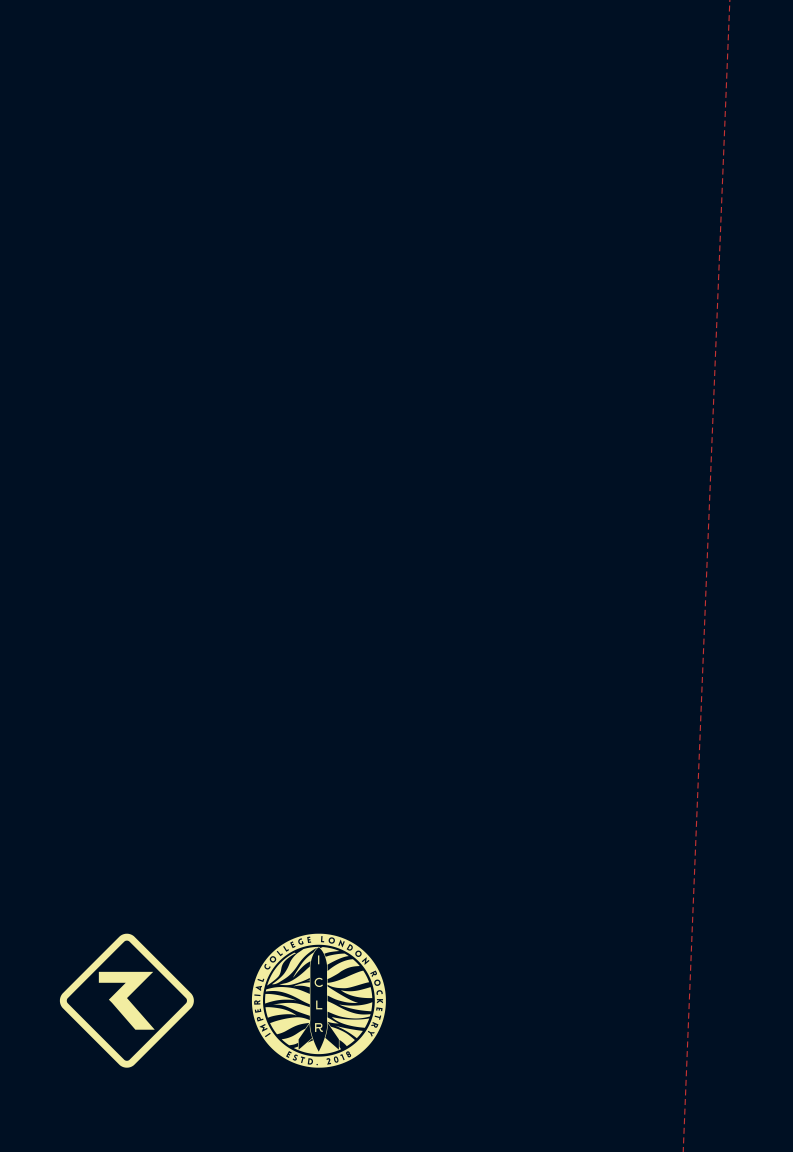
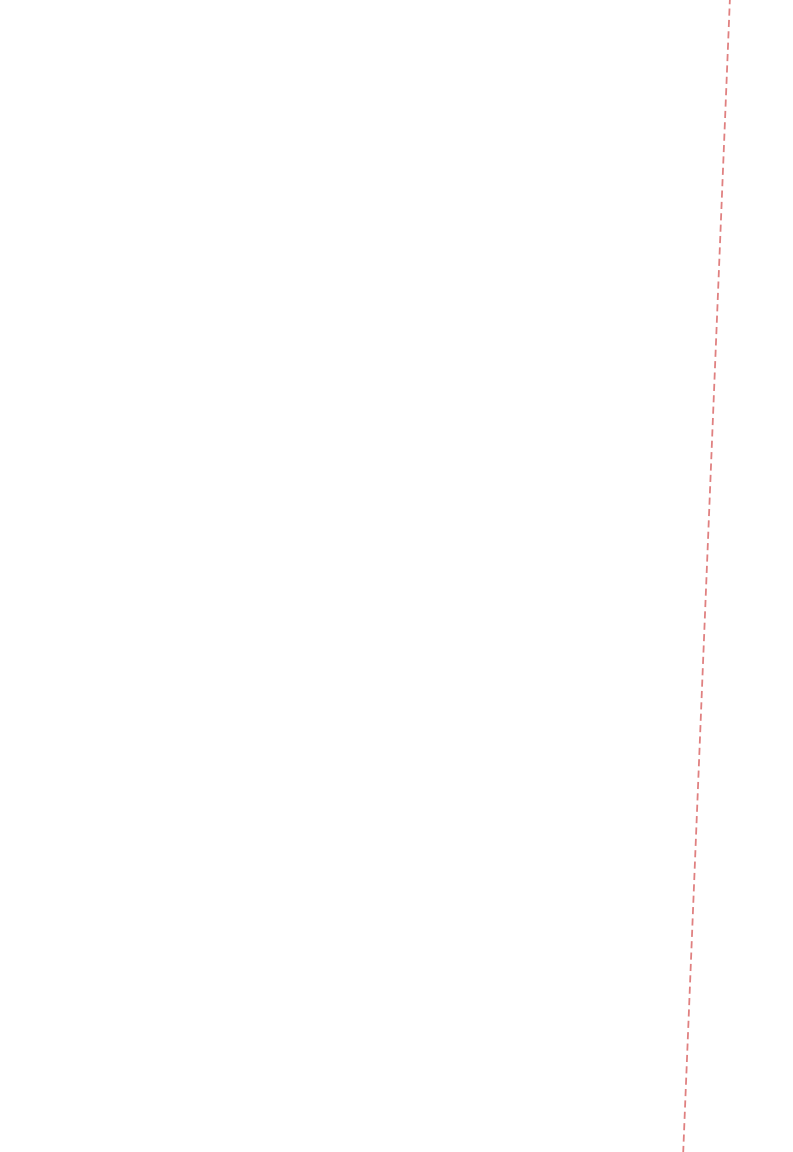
drawing: [59, 933, 194, 1068] -> none
drawing: [251, 933, 386, 1068] -> none

